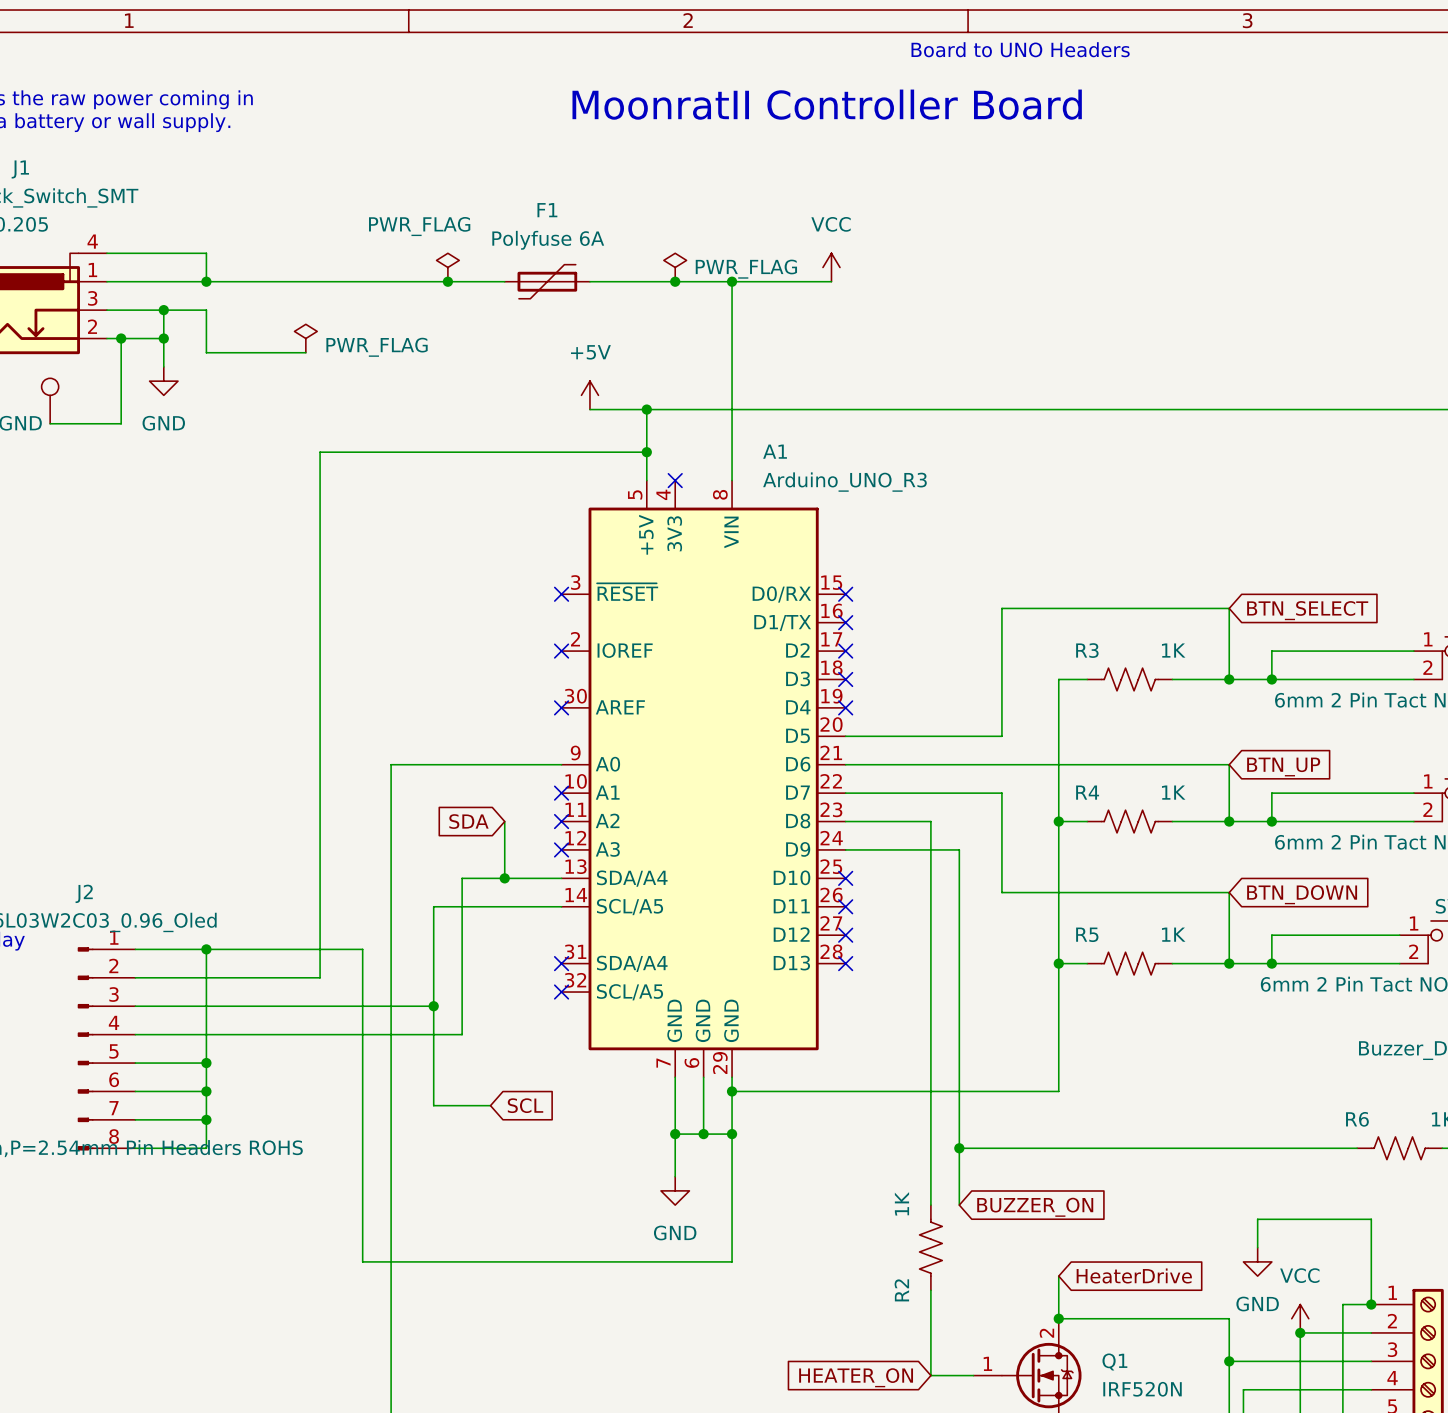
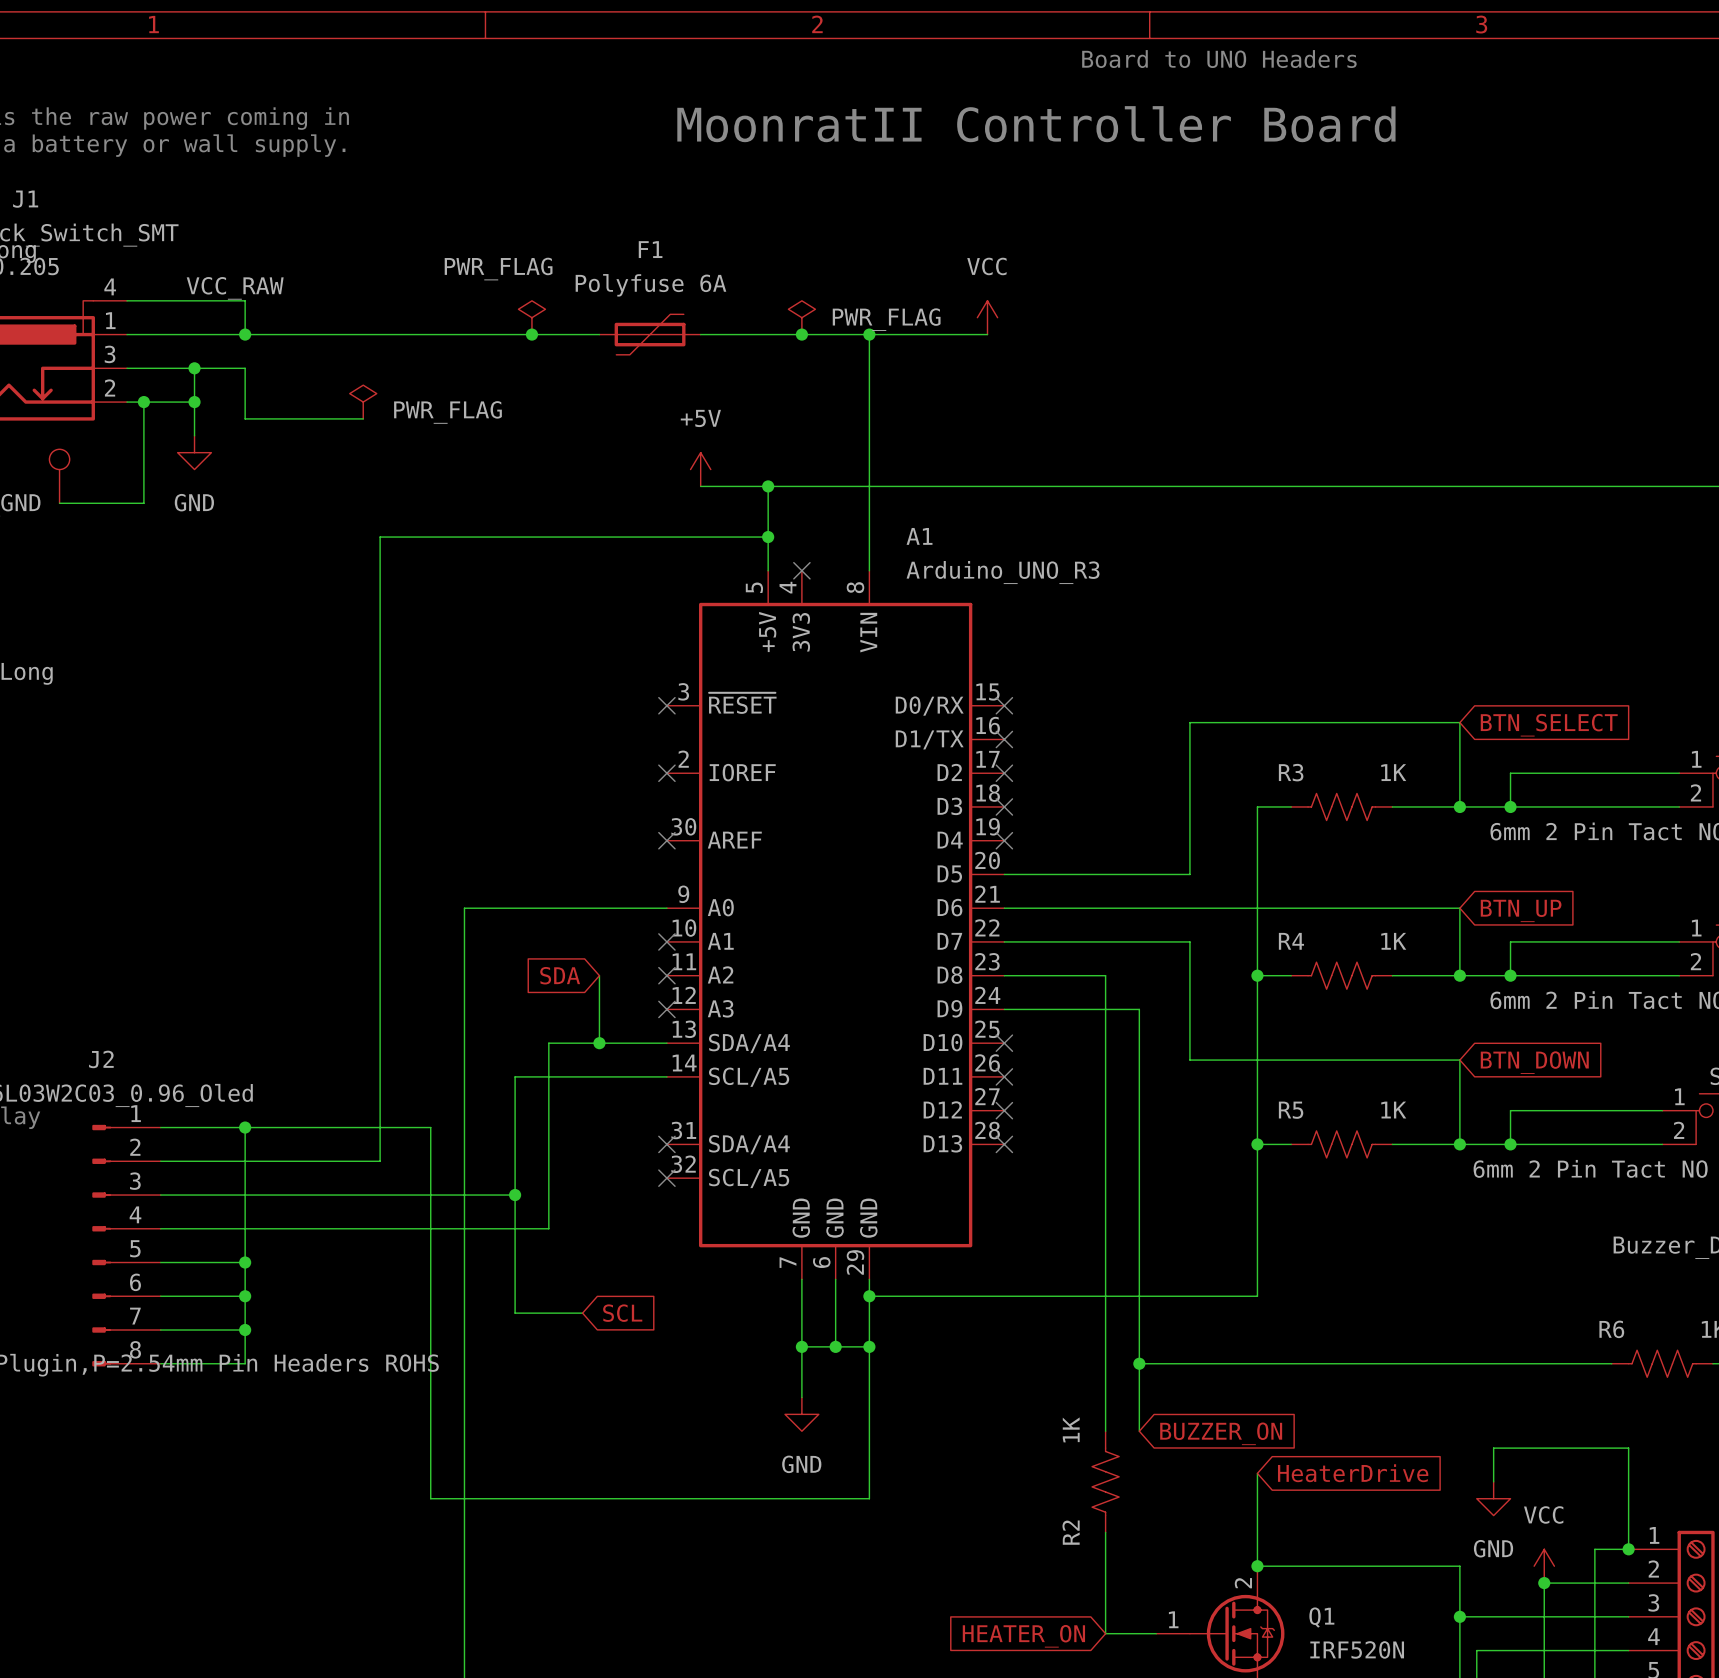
label: none -> VCC_RAW (235, 288)
wire: none -> (1257, 1473) (1257, 1515)
global label position: HeaterDrive (1134, 1275) -> HeaterDrive (1353, 1473)

